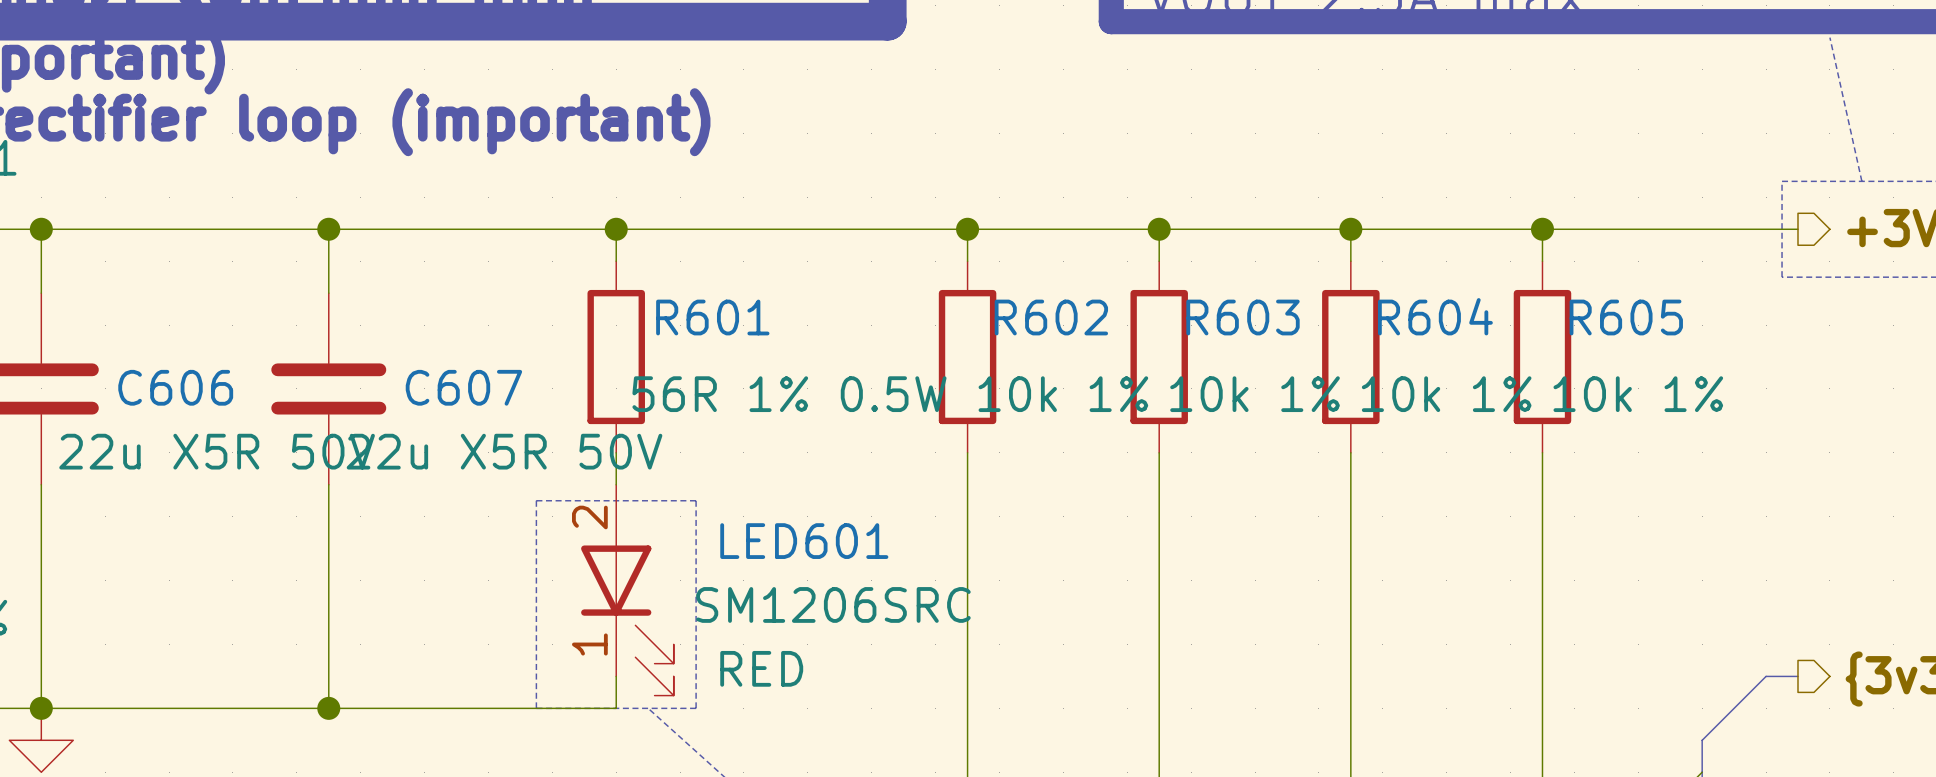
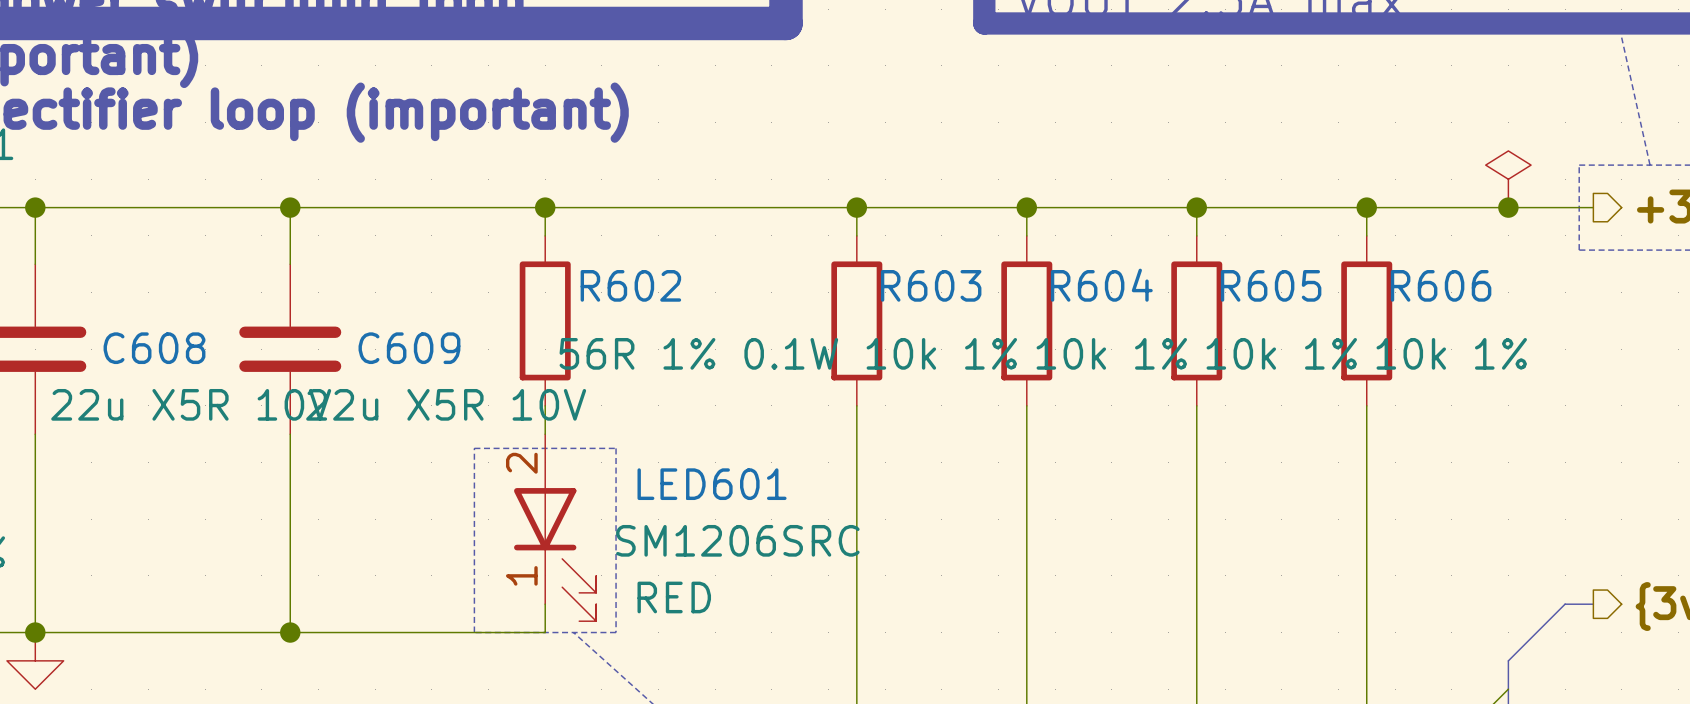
power symbol: none -> (1508, 179)
junction: none -> (1508, 207)
R604 name: R604 (1435, 316) -> R605 (1271, 285)
R601 name: R601 (712, 317) -> R602 (630, 285)
R602 name: R602 (1051, 317) -> R603 (931, 285)
R603 name: R603 (1243, 317) -> R604 (1101, 285)
R605 name: R605 (1626, 317) -> R606 (1441, 285)
C606 name: C606 (175, 387) -> C608 (154, 348)
C607 name: C607 (463, 387) -> C609 (409, 348)
R601 value: 56R 1% 0.5W (789, 394) -> 56R 1% 0.1W (698, 353)
C606 value: 22u X5R 50V (217, 451) -> 22u X5R 10V (191, 404)
C607 value: 22u X5R 50V (504, 451) -> 22u X5R 10V (446, 404)

